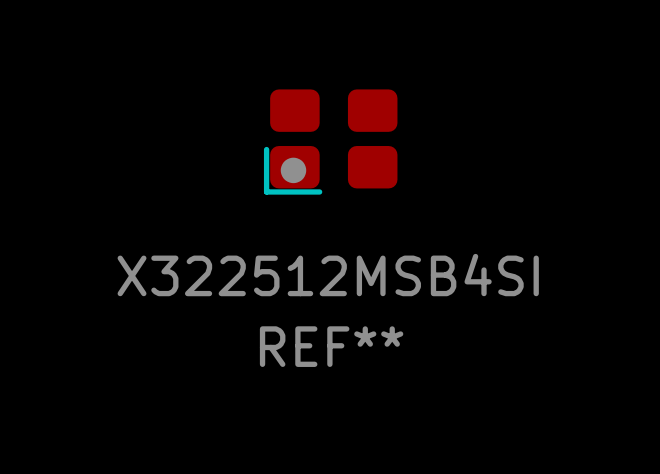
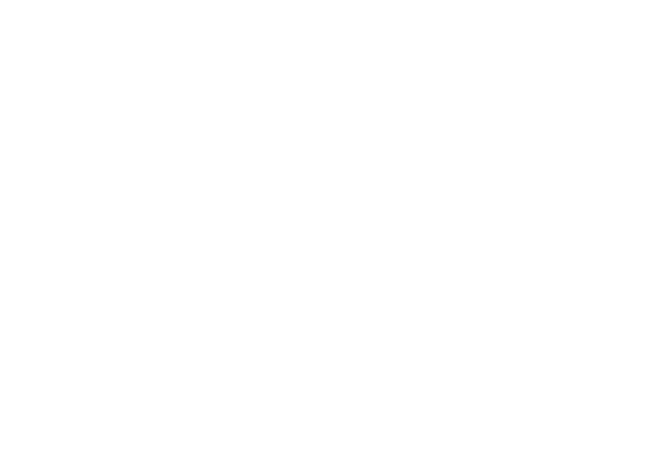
part: X322512MSB4SI (330, 142) -> none

